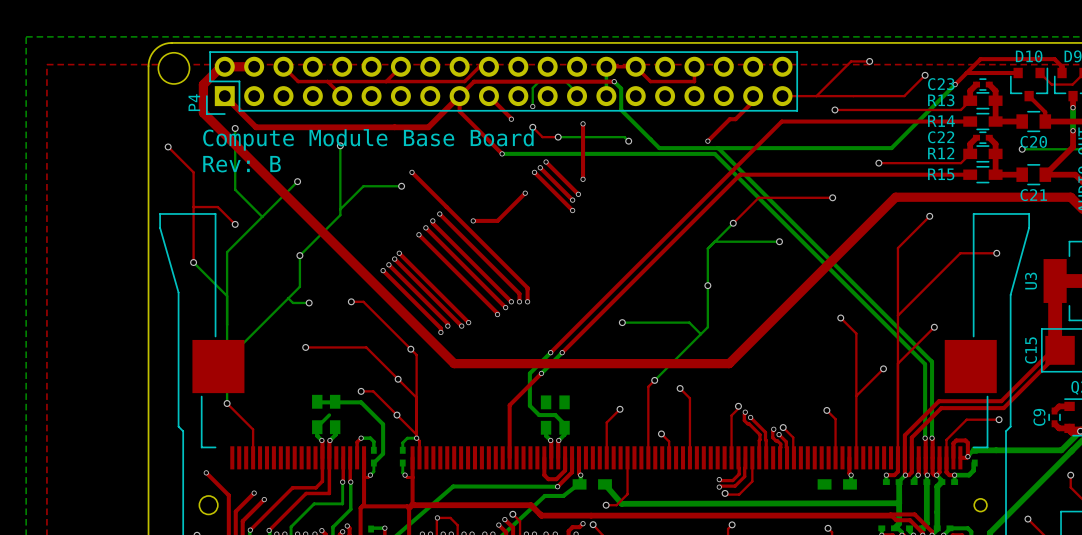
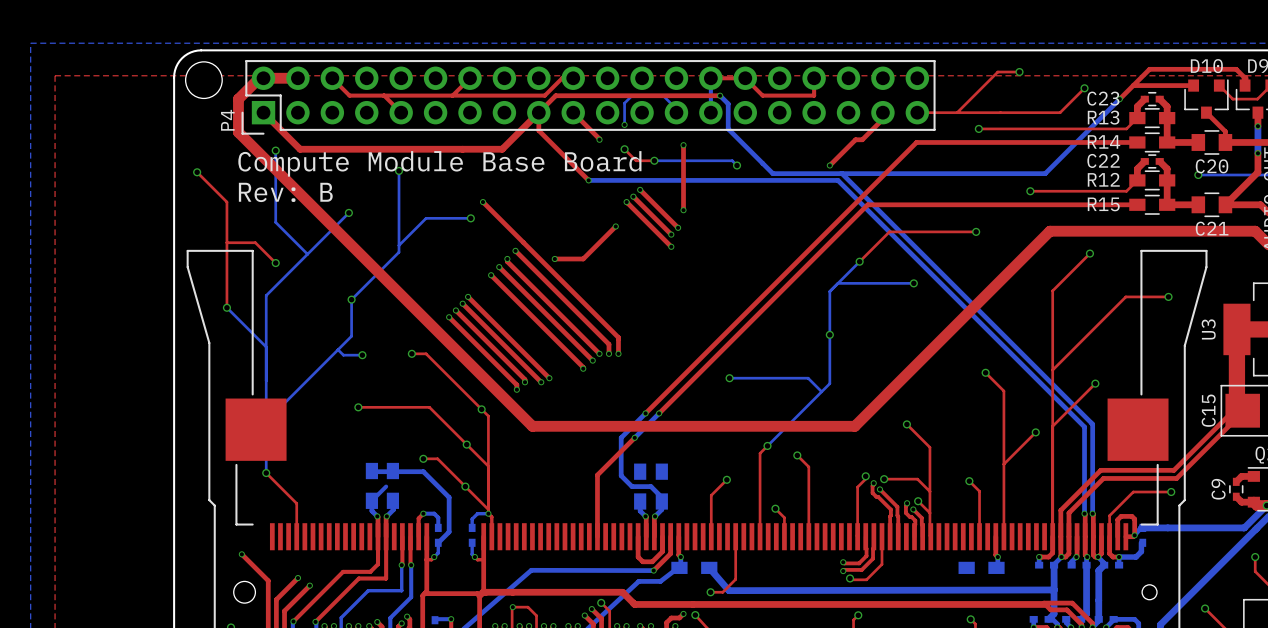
top track: none -> (906, 424) (929, 447) (929, 513)
via: none -> (906, 424)
top track: none -> (884, 479) (917, 479) (929, 491)
via: none -> (884, 479)

